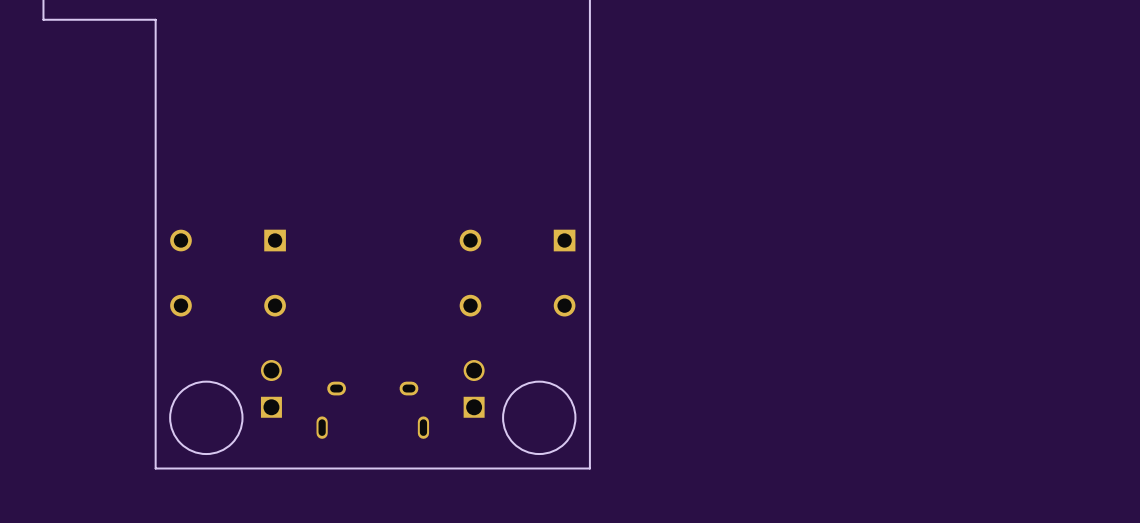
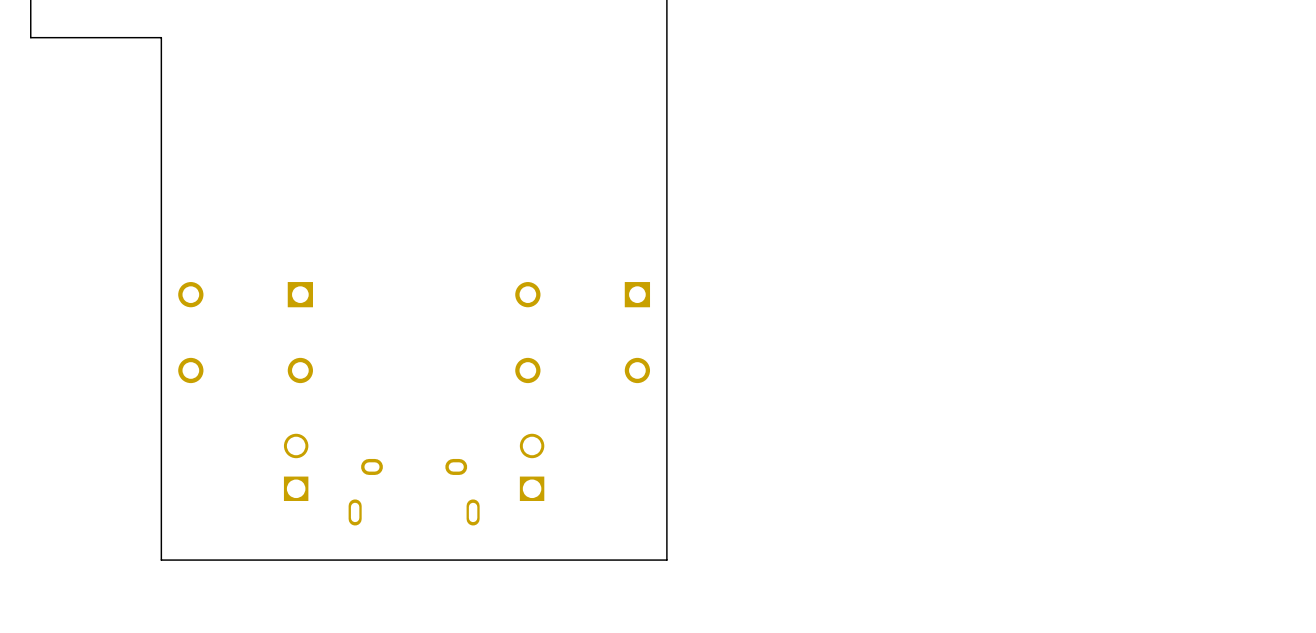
round board edge: [169, 381, 243, 455] -> none
round board edge: [502, 381, 576, 455] -> none

